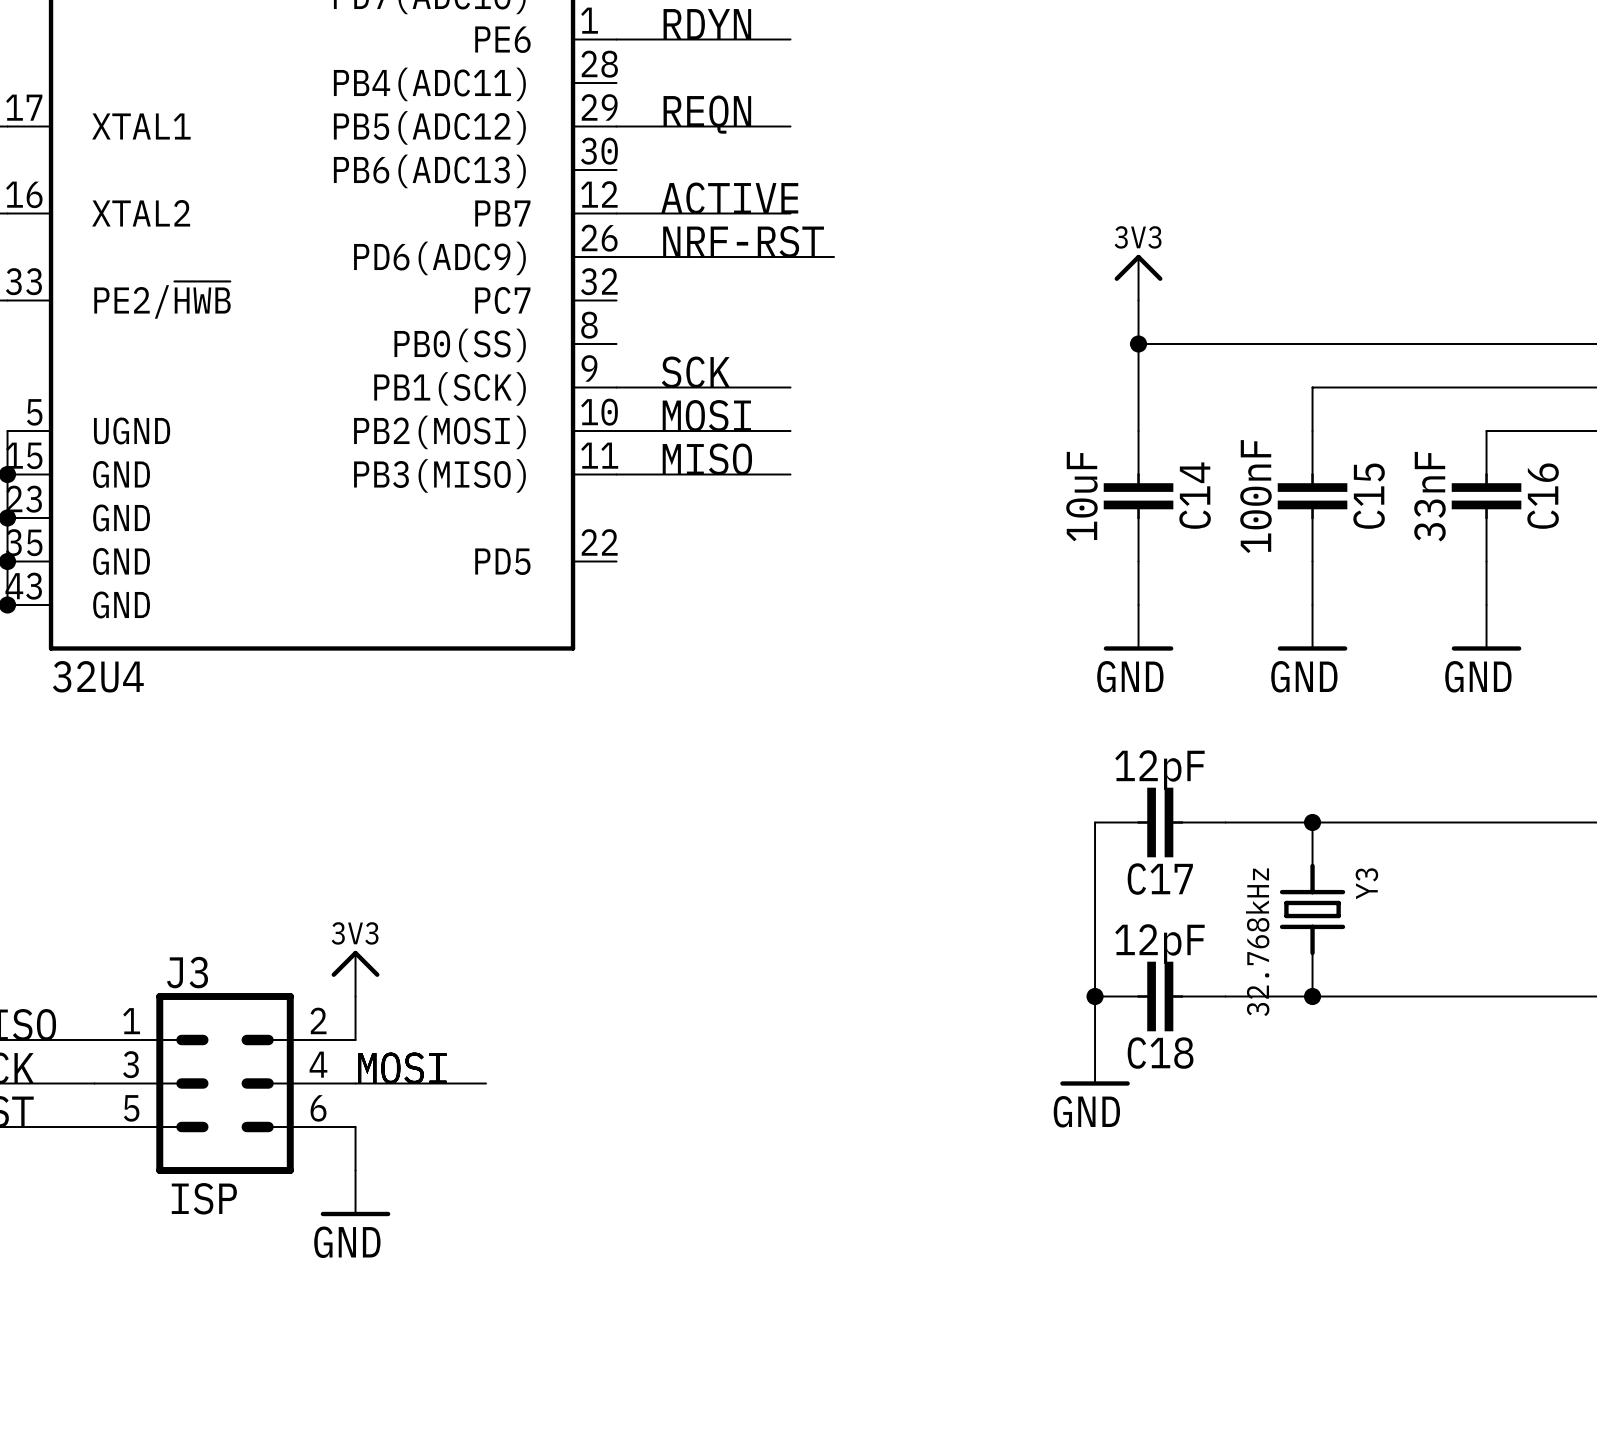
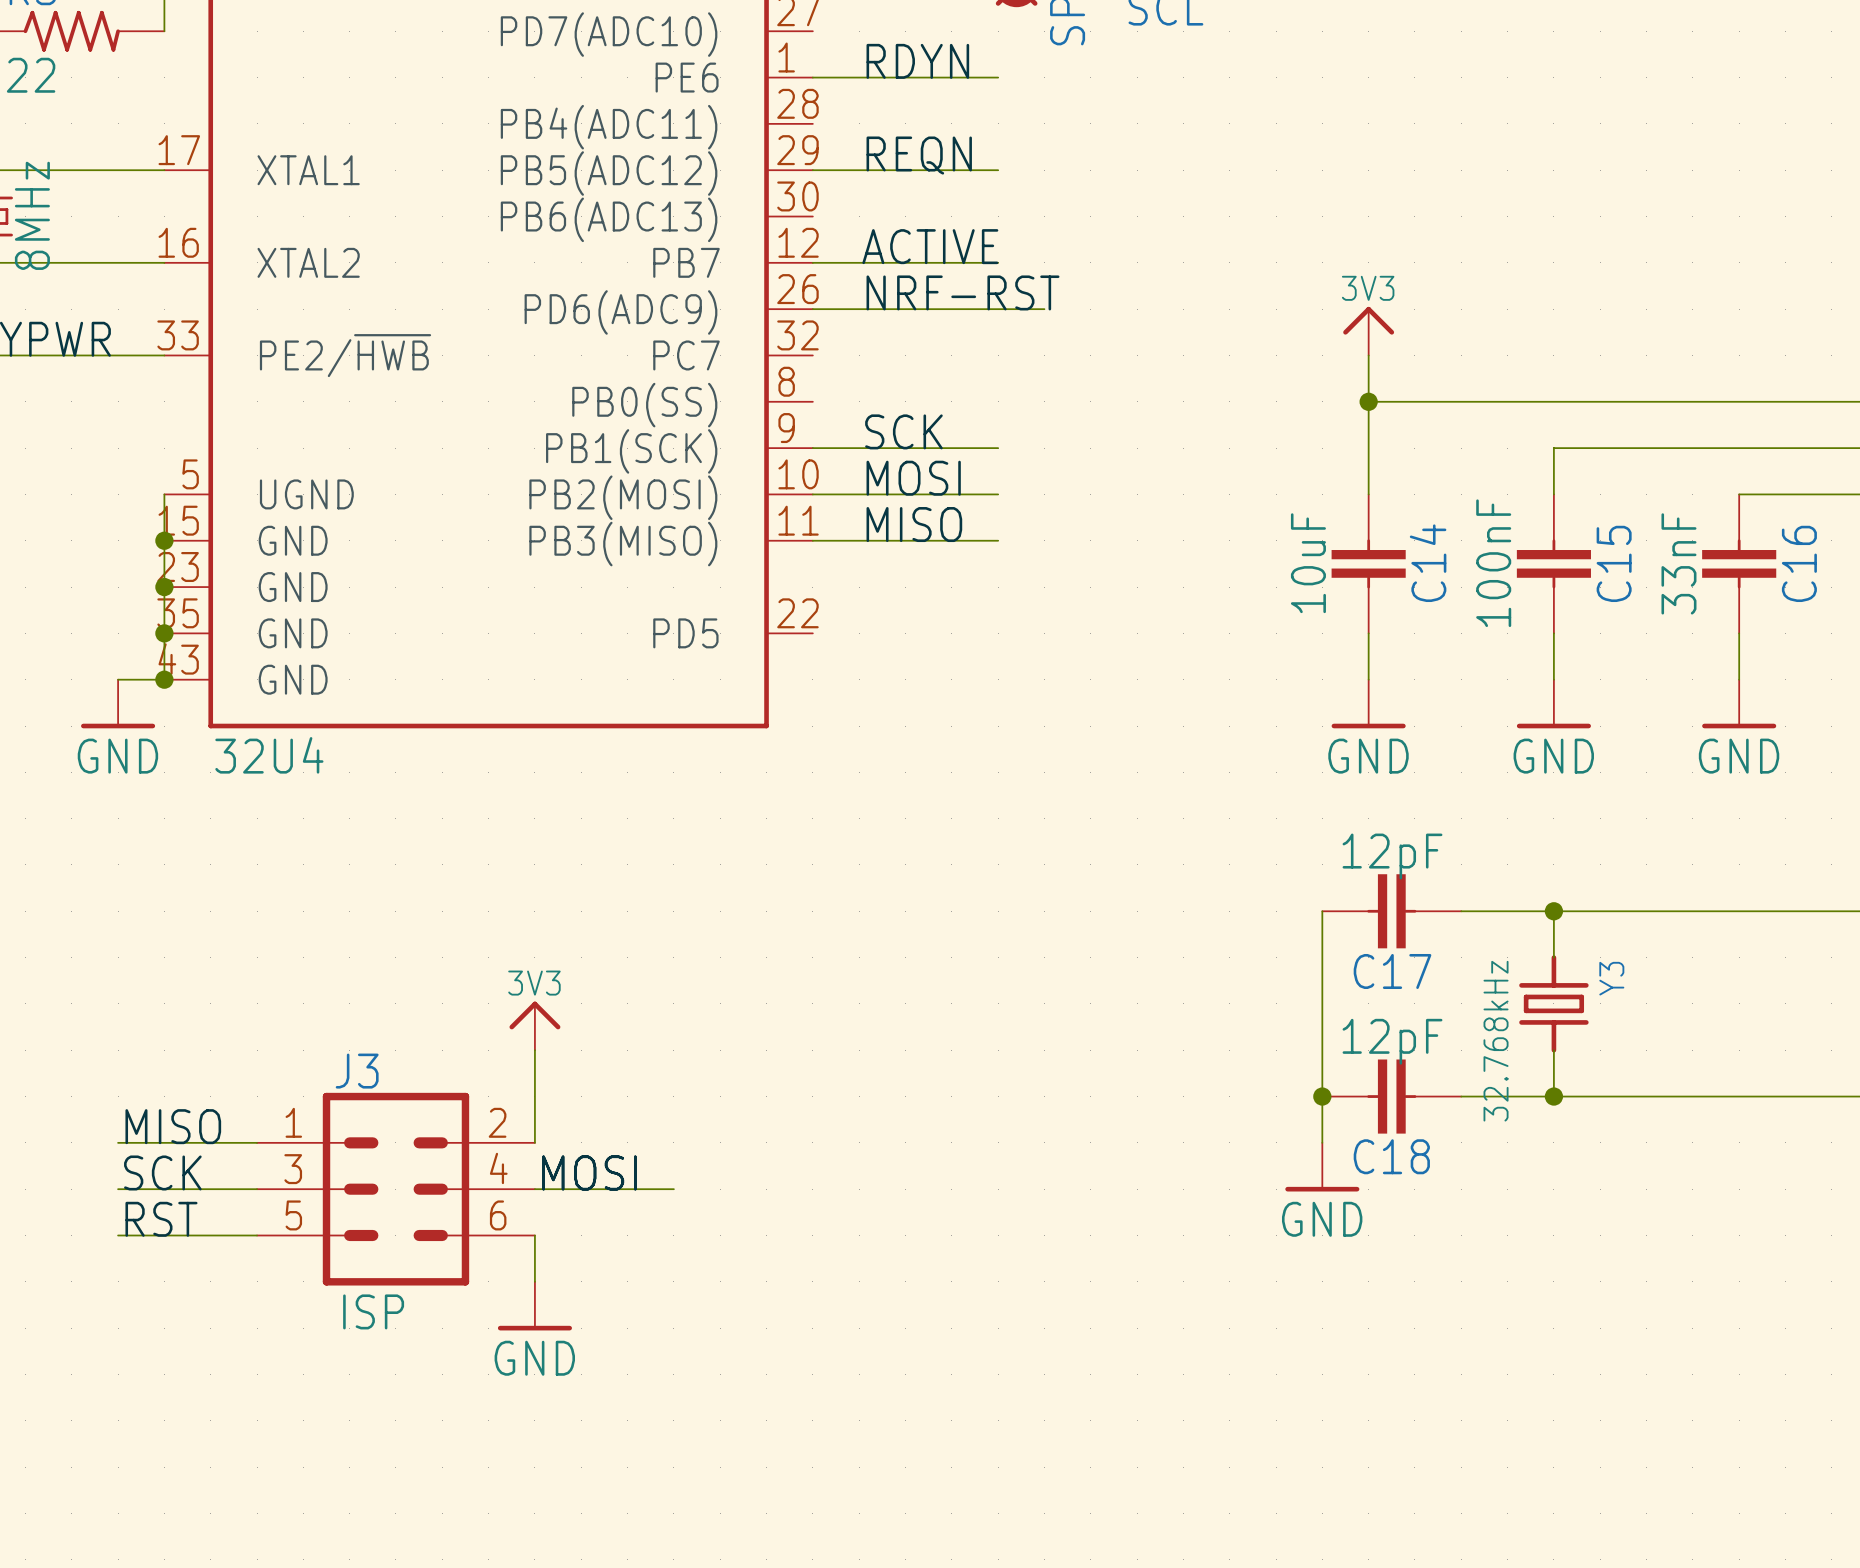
power symbol position: 3V3 (355, 973) -> 3V3 (534, 1025)

